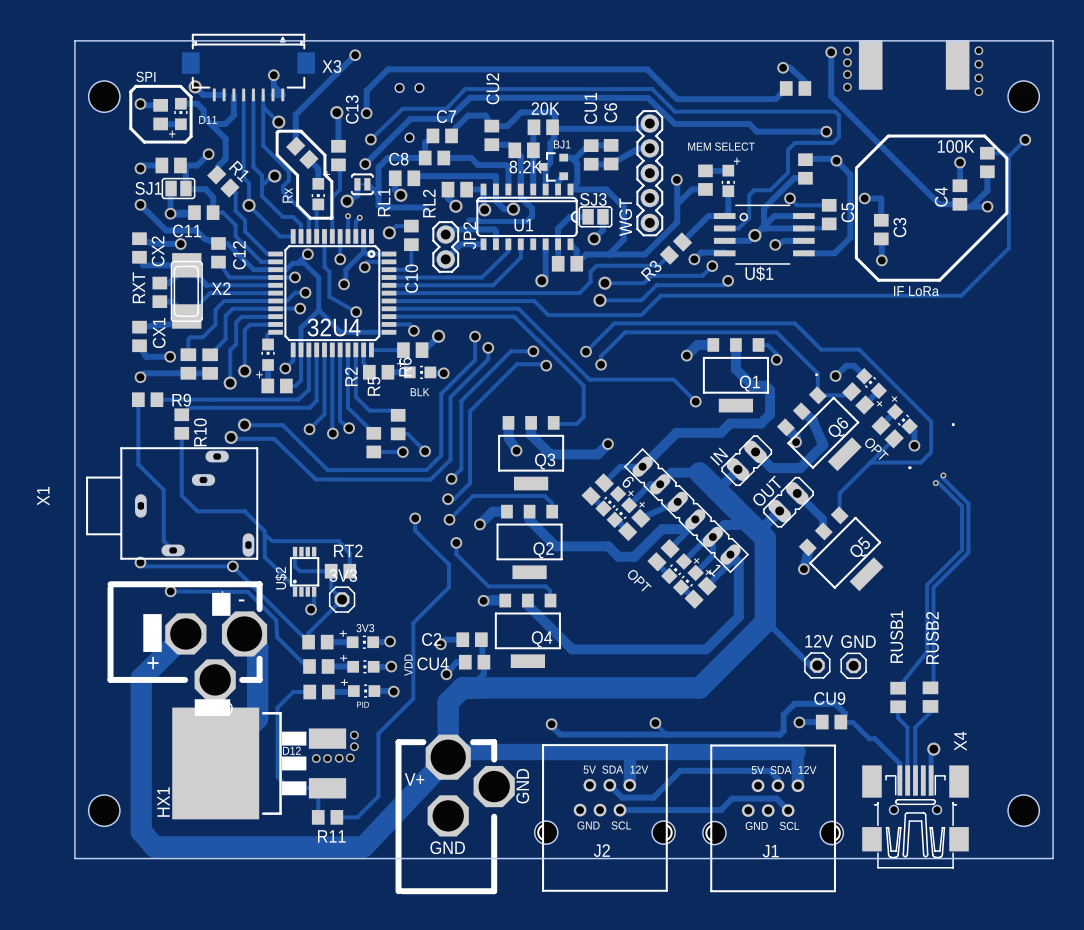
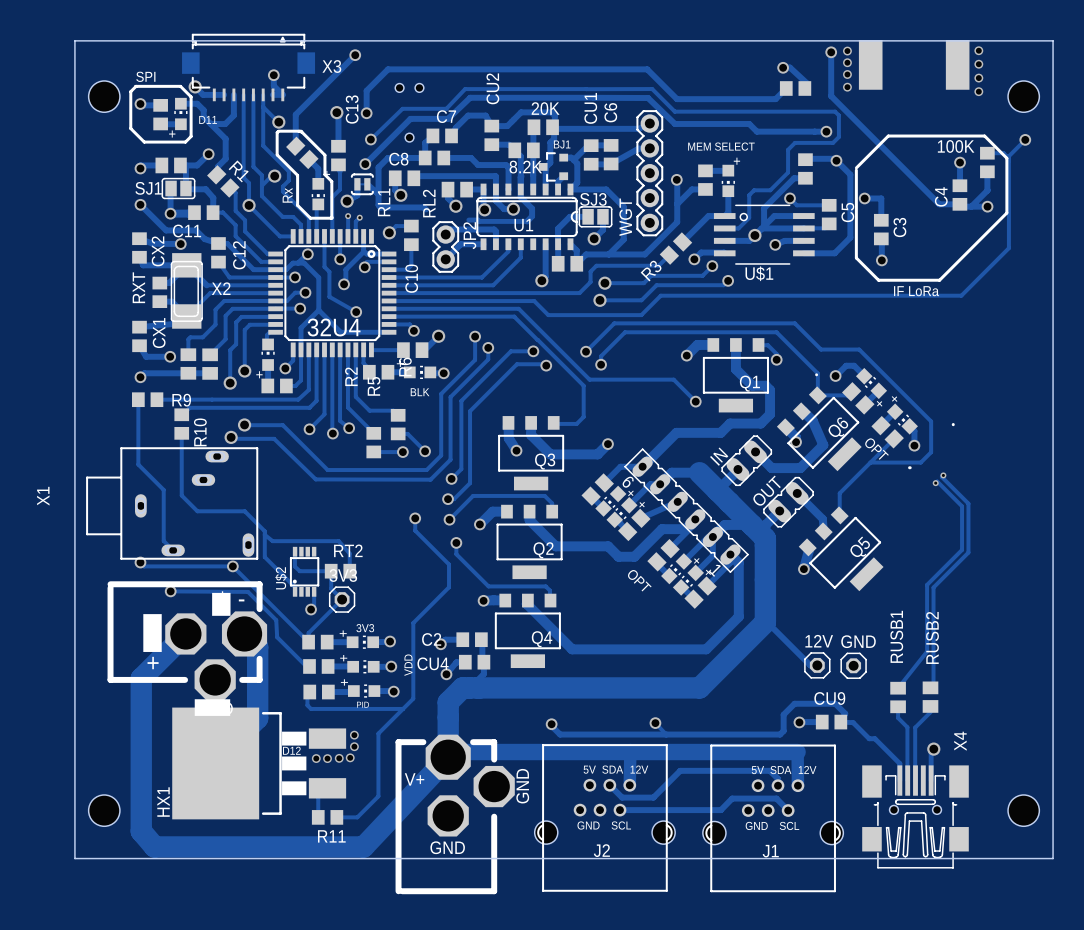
track: (309, 692) (293, 692) (277, 707) (277, 776) (288, 787) (327, 787) (324, 790) -> (309, 692) (307, 694) (307, 705) (311, 708) (403, 708)

